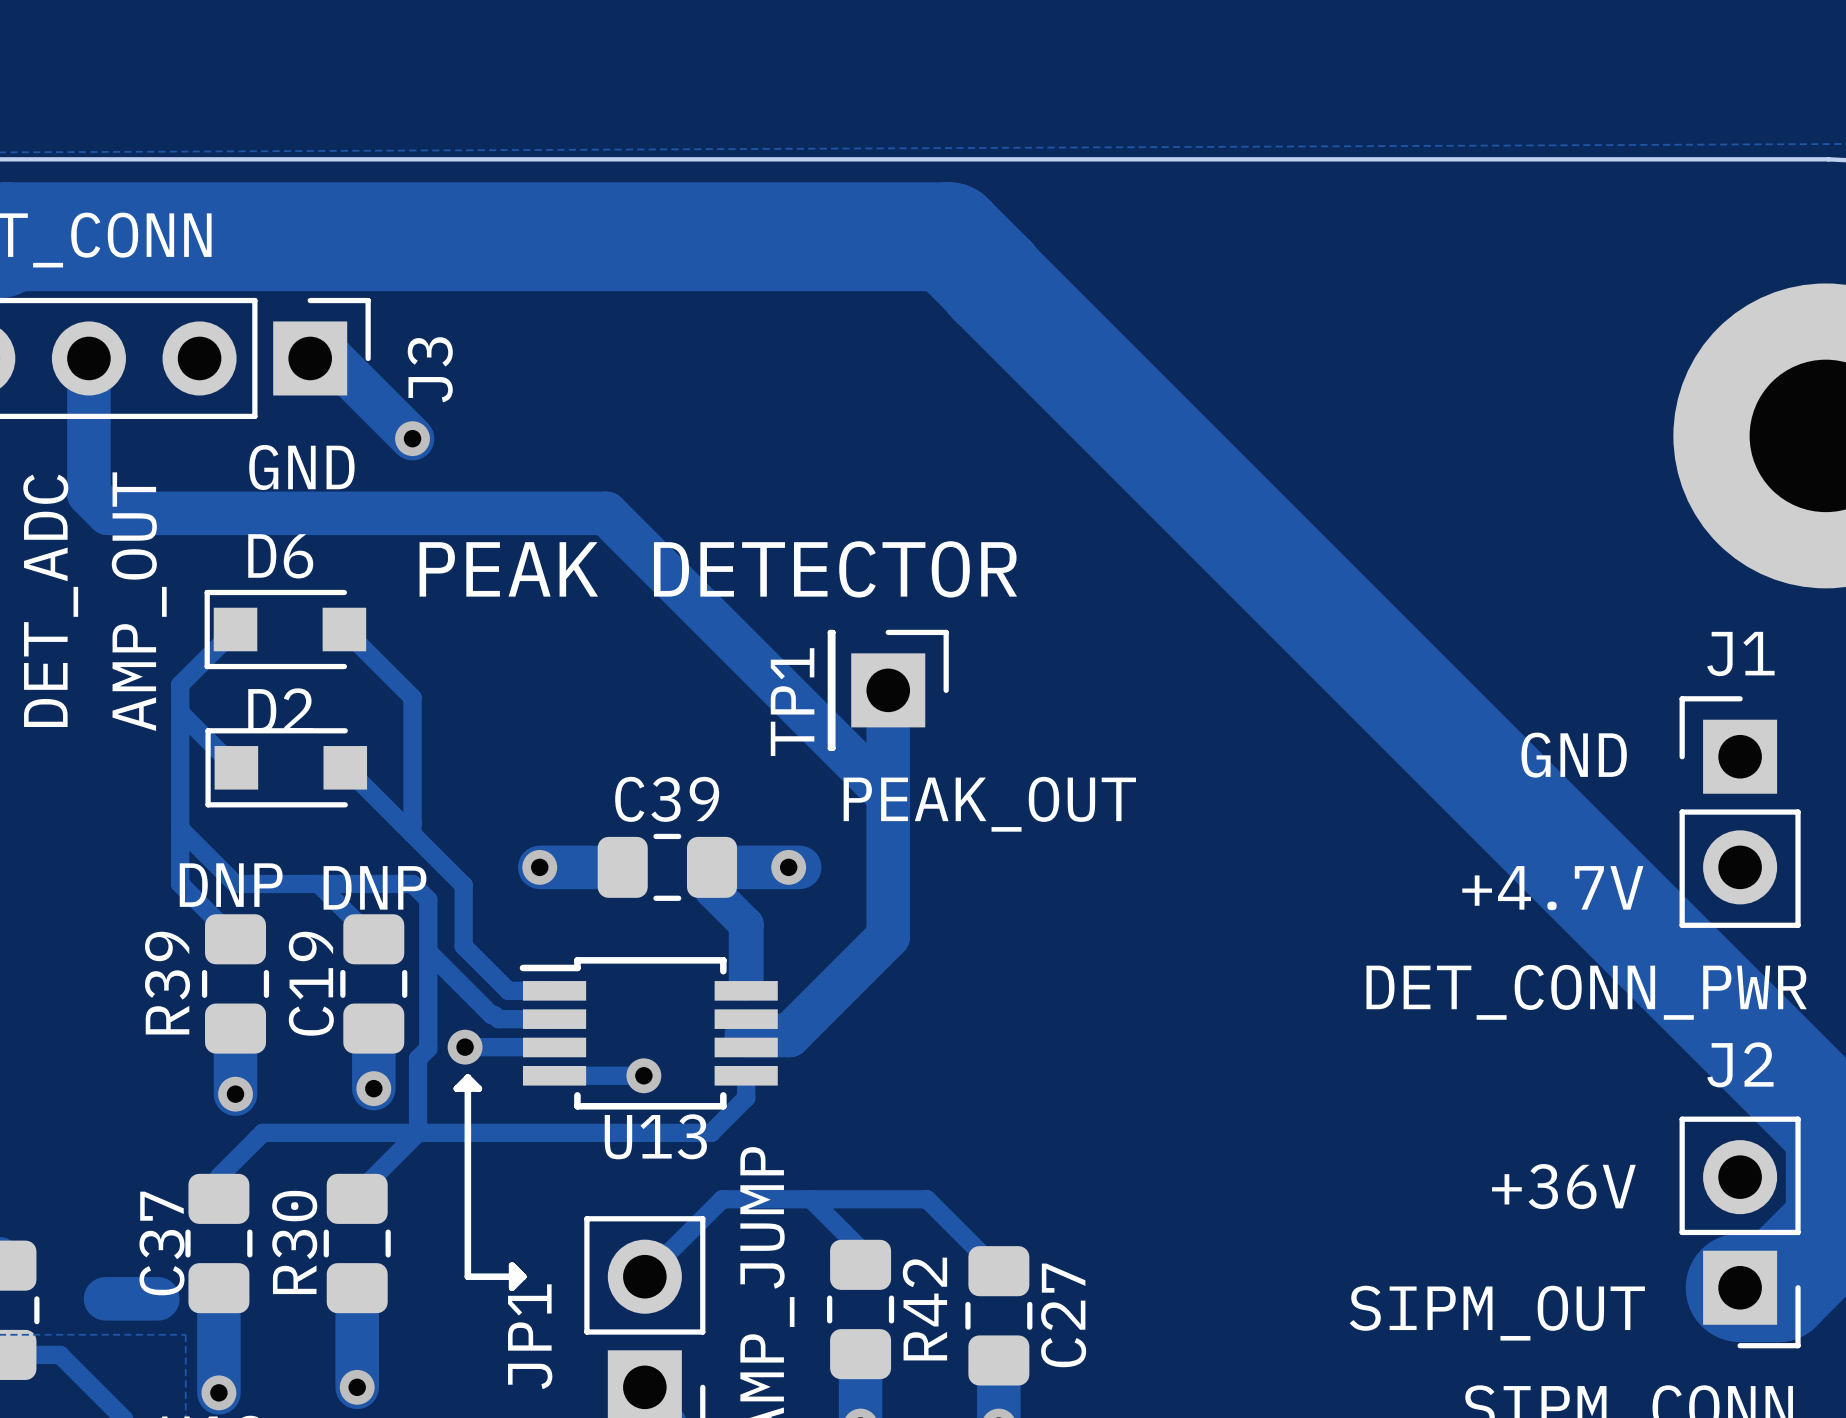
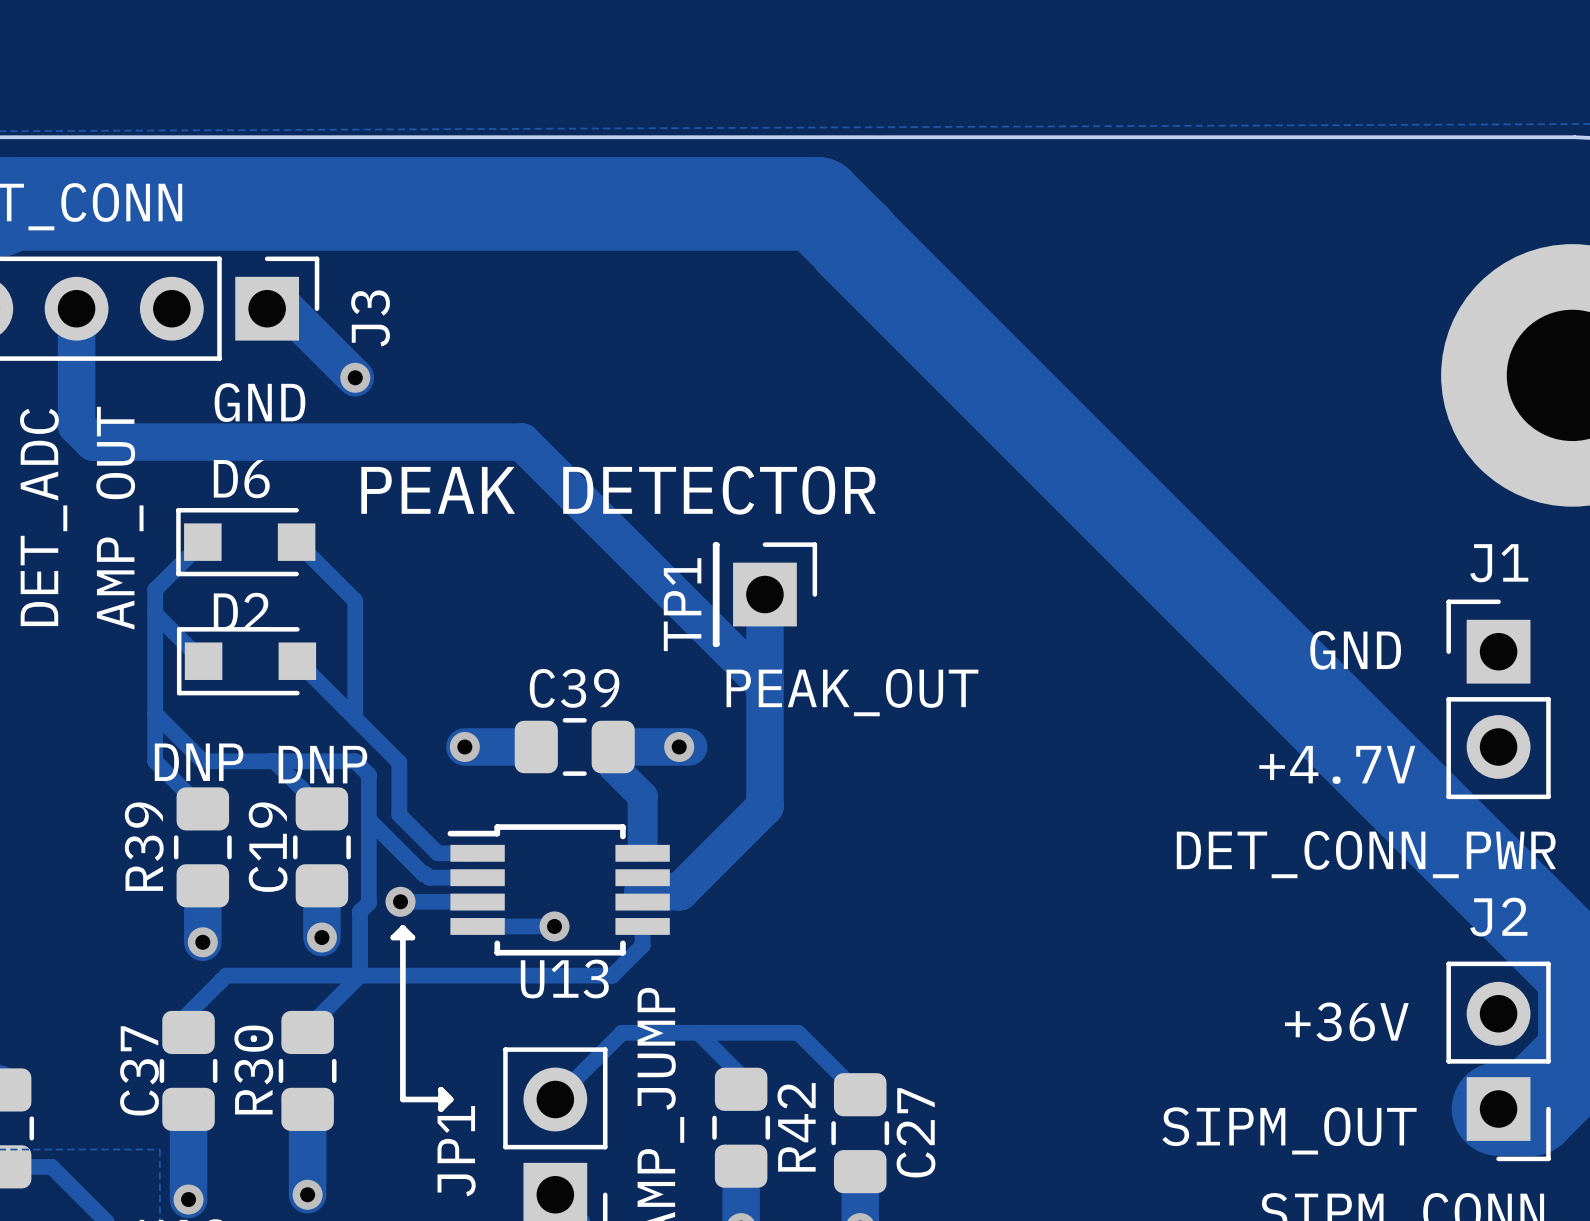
track: (105, 1298) (157, 1298) -> none

